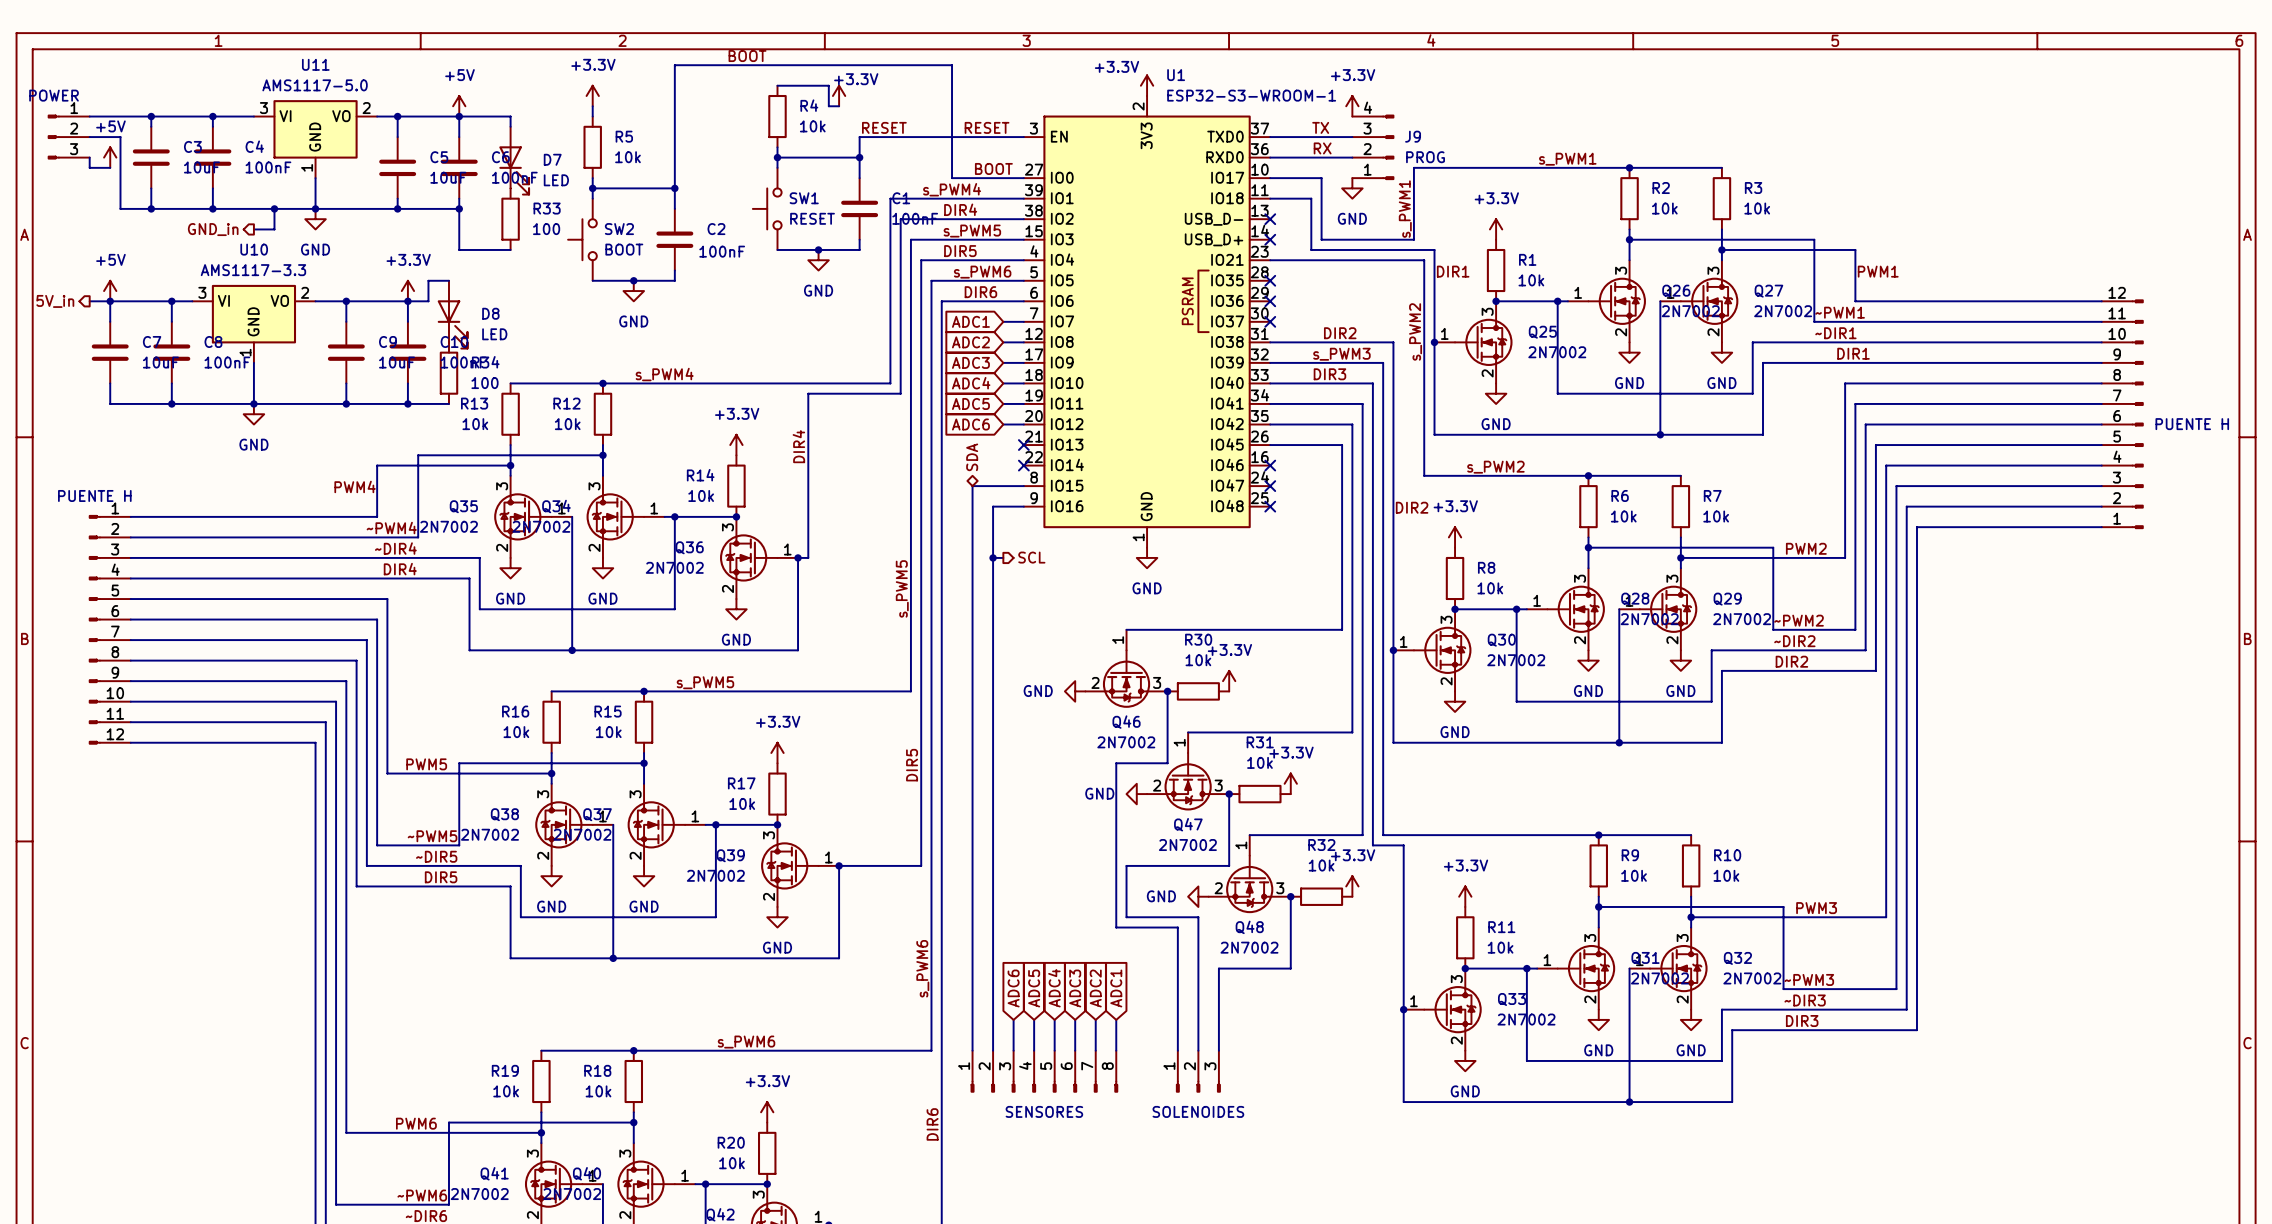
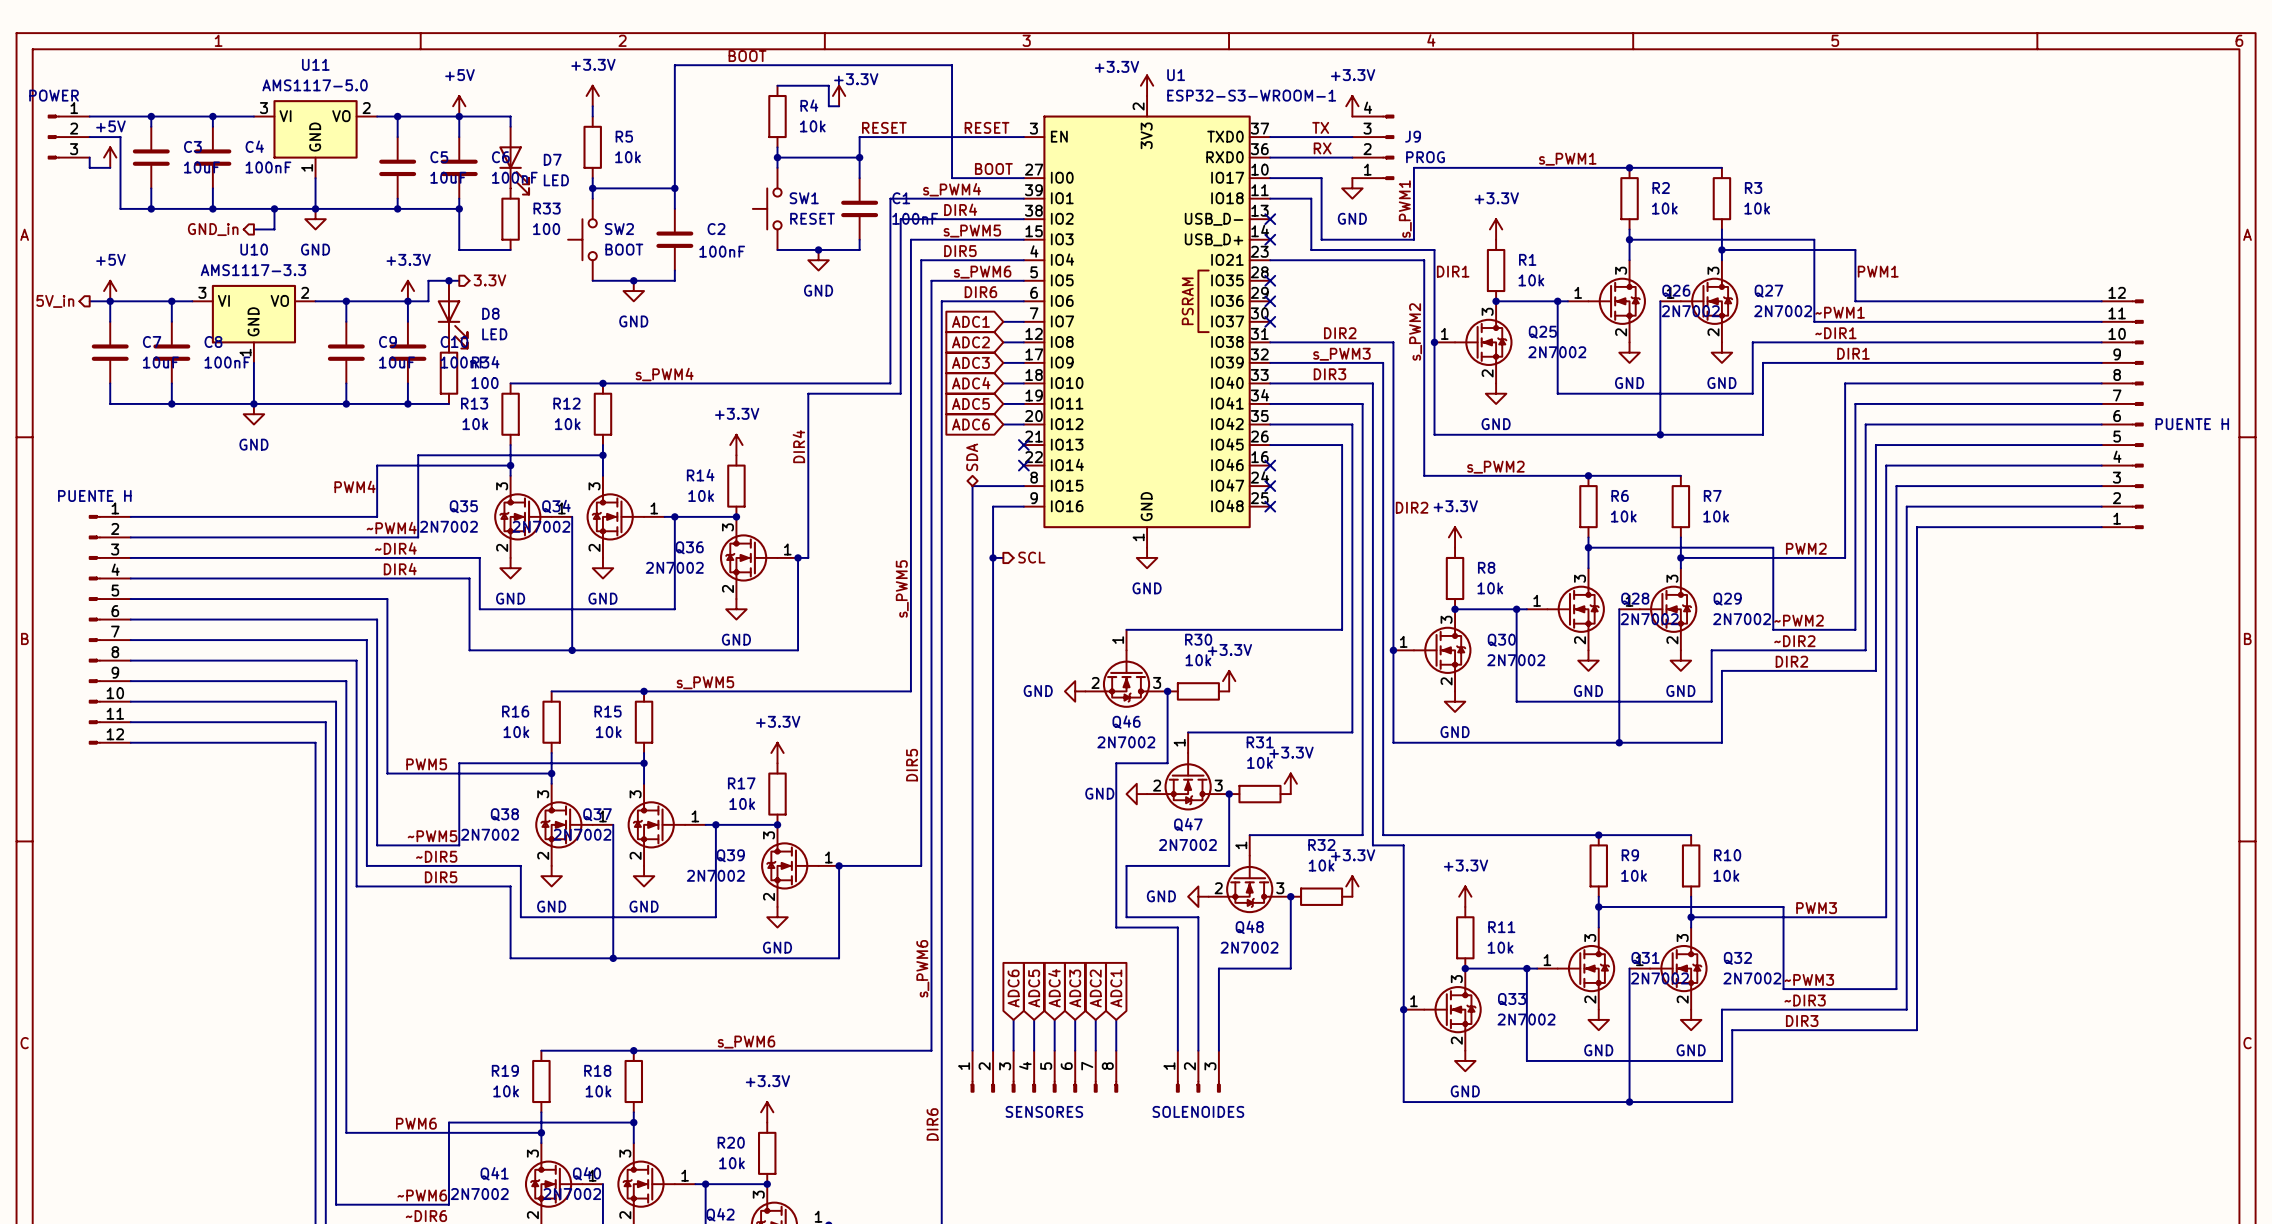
wire: none -> (448, 280) (459, 280)
junction: none -> (448, 280)
hierarchical label: none -> 3.3V (489, 280)

